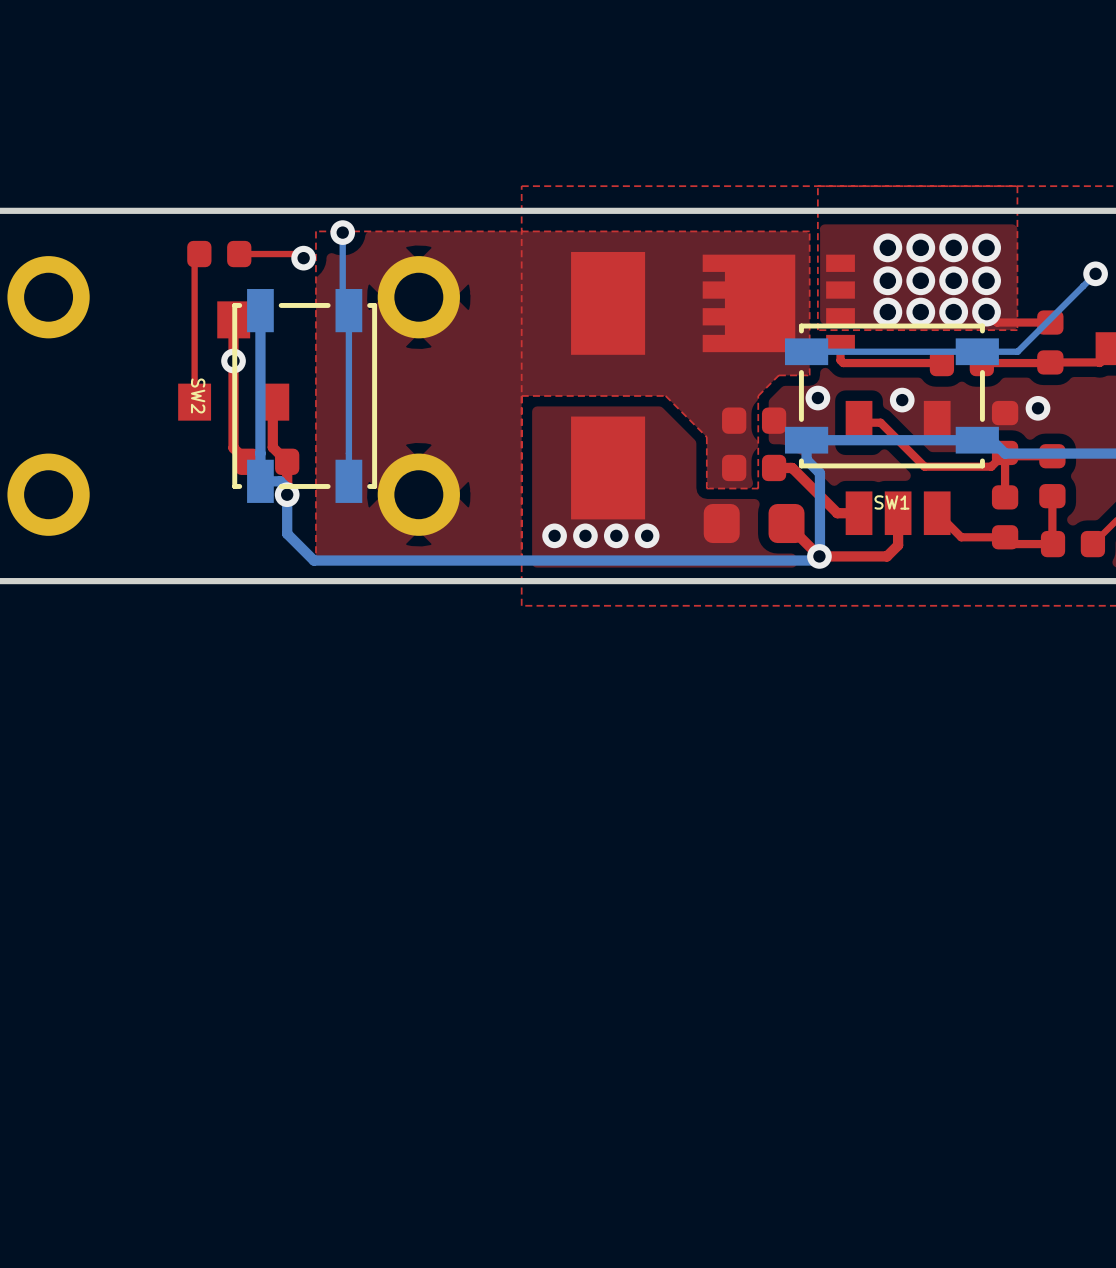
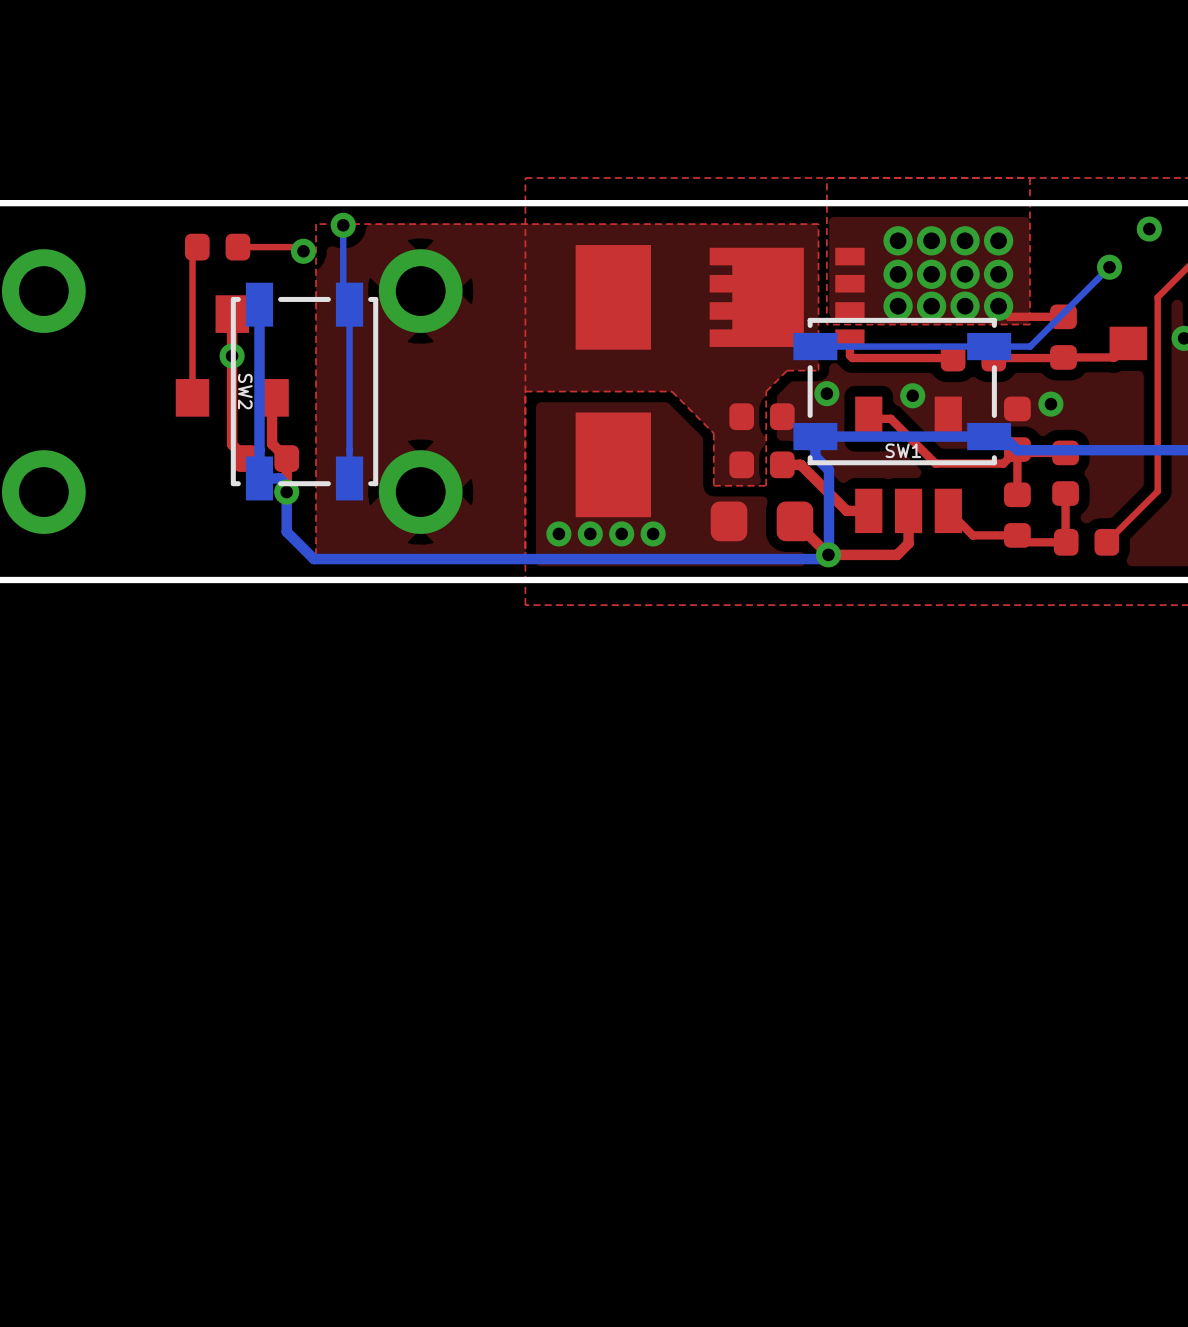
SW2 name position: SW2 (198, 395) -> SW2 (245, 391)
SW1 name position: SW1 (891, 502) -> SW1 (903, 450)

